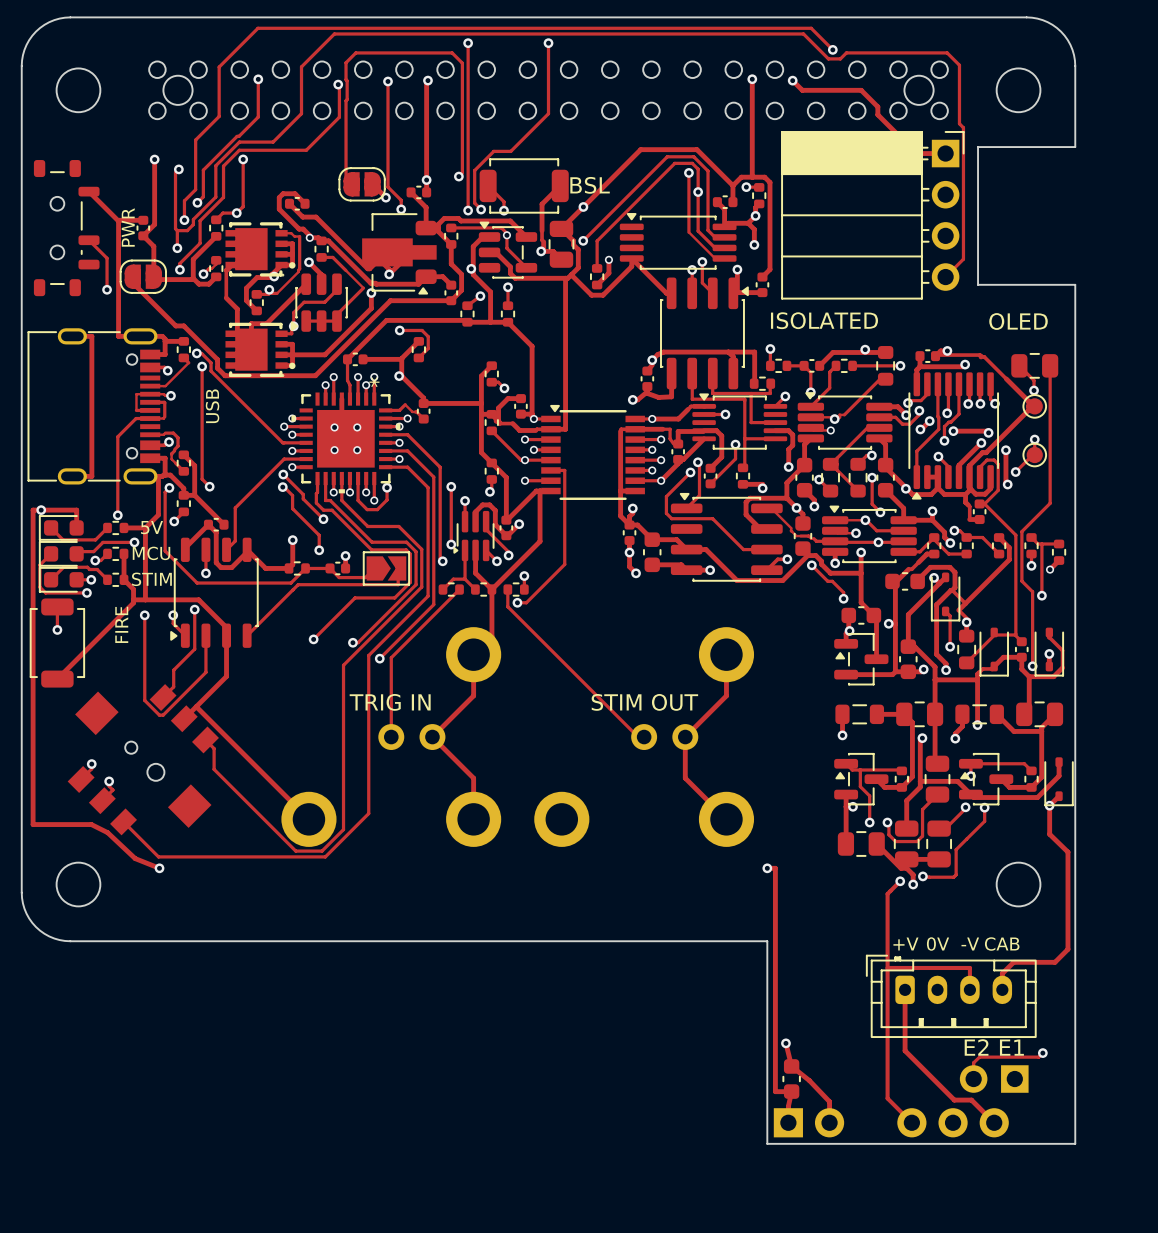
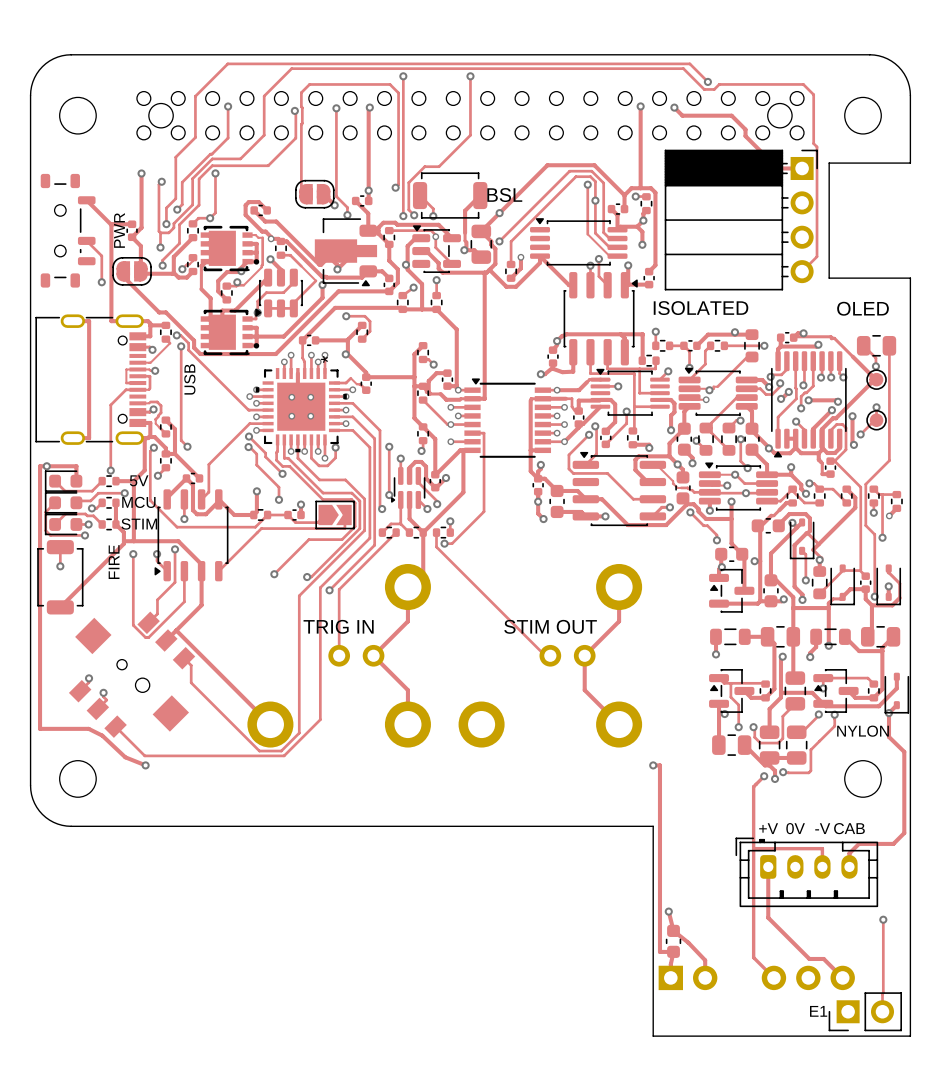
text: none -> NYLON (863, 731)
text: E2 E1 (994, 1047) -> none
track: (1042, 1053) (1038, 1057) (979, 1057) (973, 1062) (973, 1079) -> (883, 919) (882, 1011)
part: (994, 1079) -> none
board edge: (767, 1143) (1075, 1143) -> (653, 995) (653, 1036) (910, 1036) (910, 995)
text: none -> E1 (818, 1011)
part: none -> (865, 1011)

